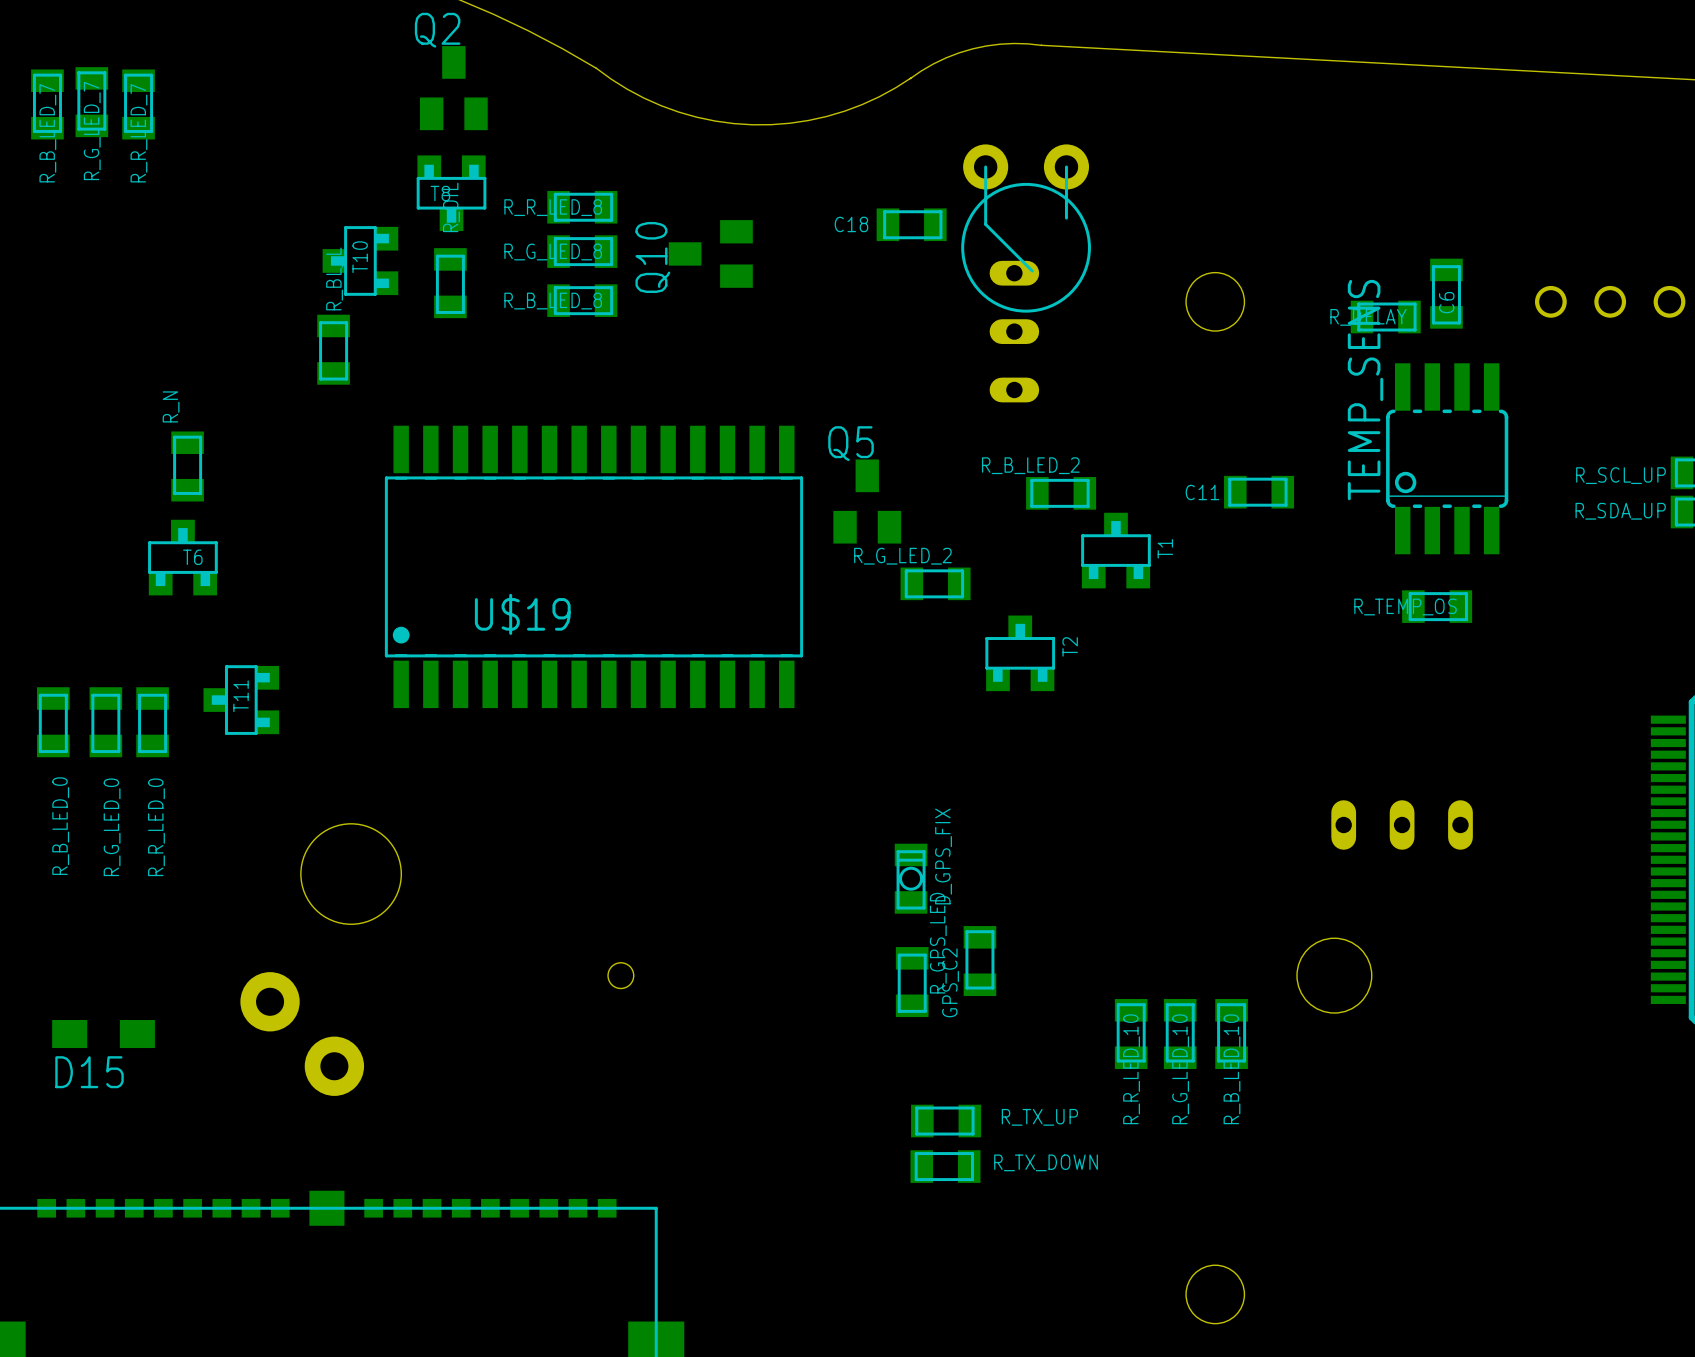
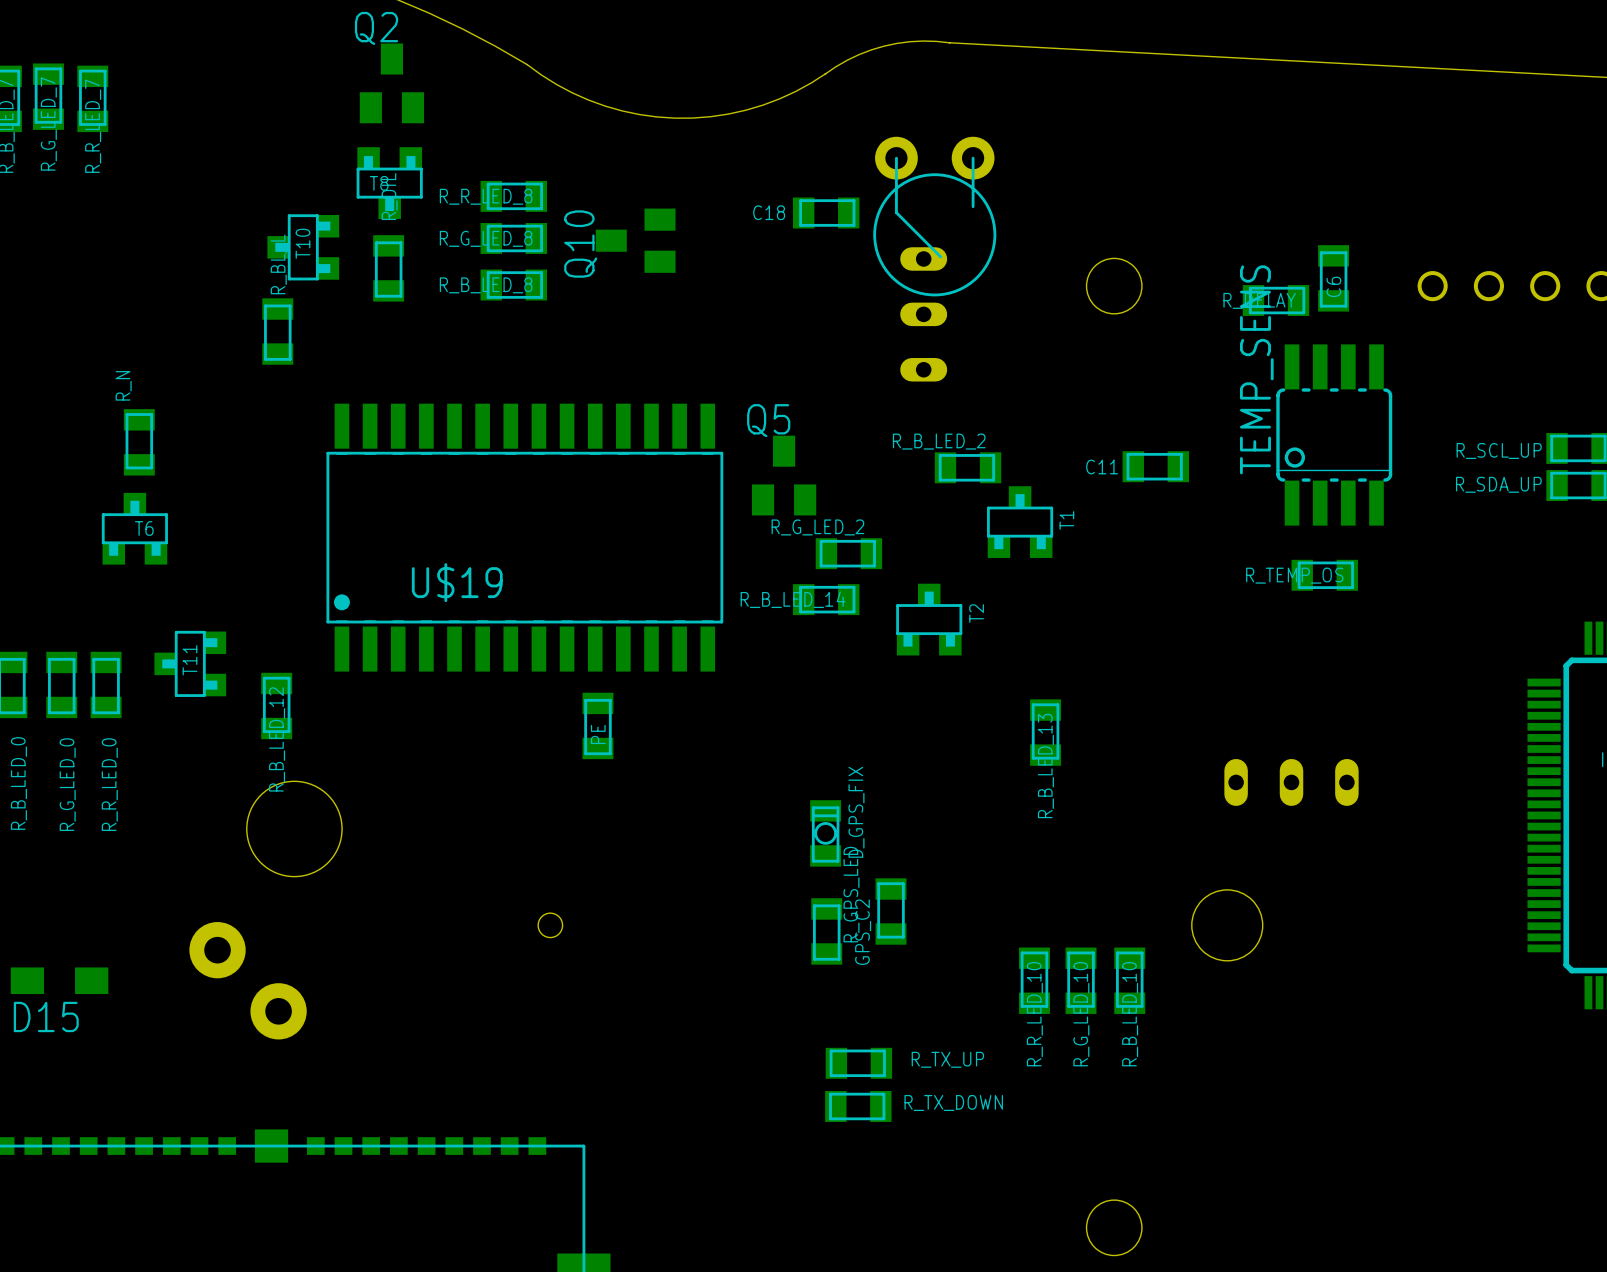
R_B_LED_14: none -> (826, 599)
R_B_LED_12: none -> (276, 706)
PE: none -> (597, 725)
R_B_LED_13: none -> (1045, 732)

